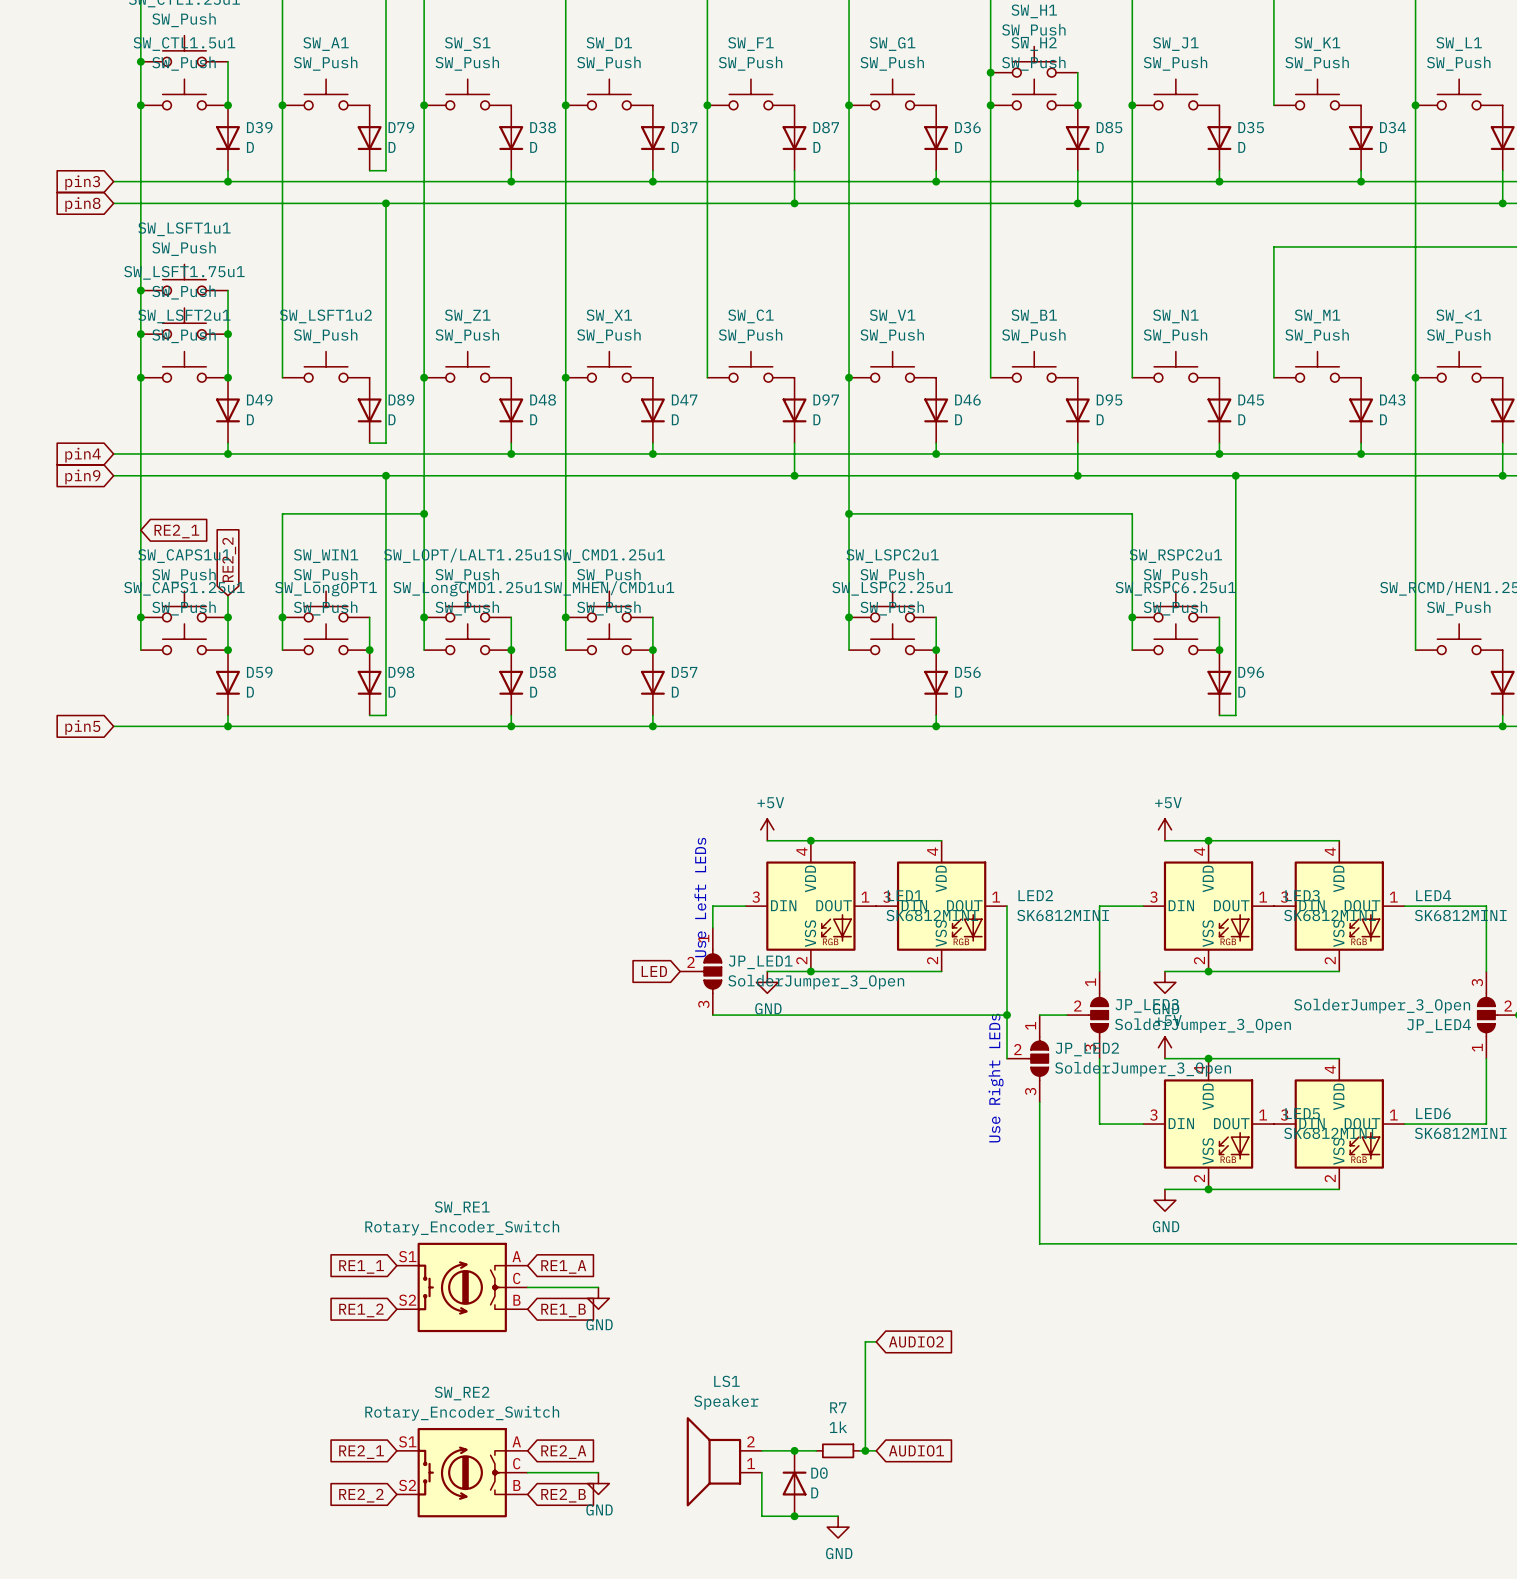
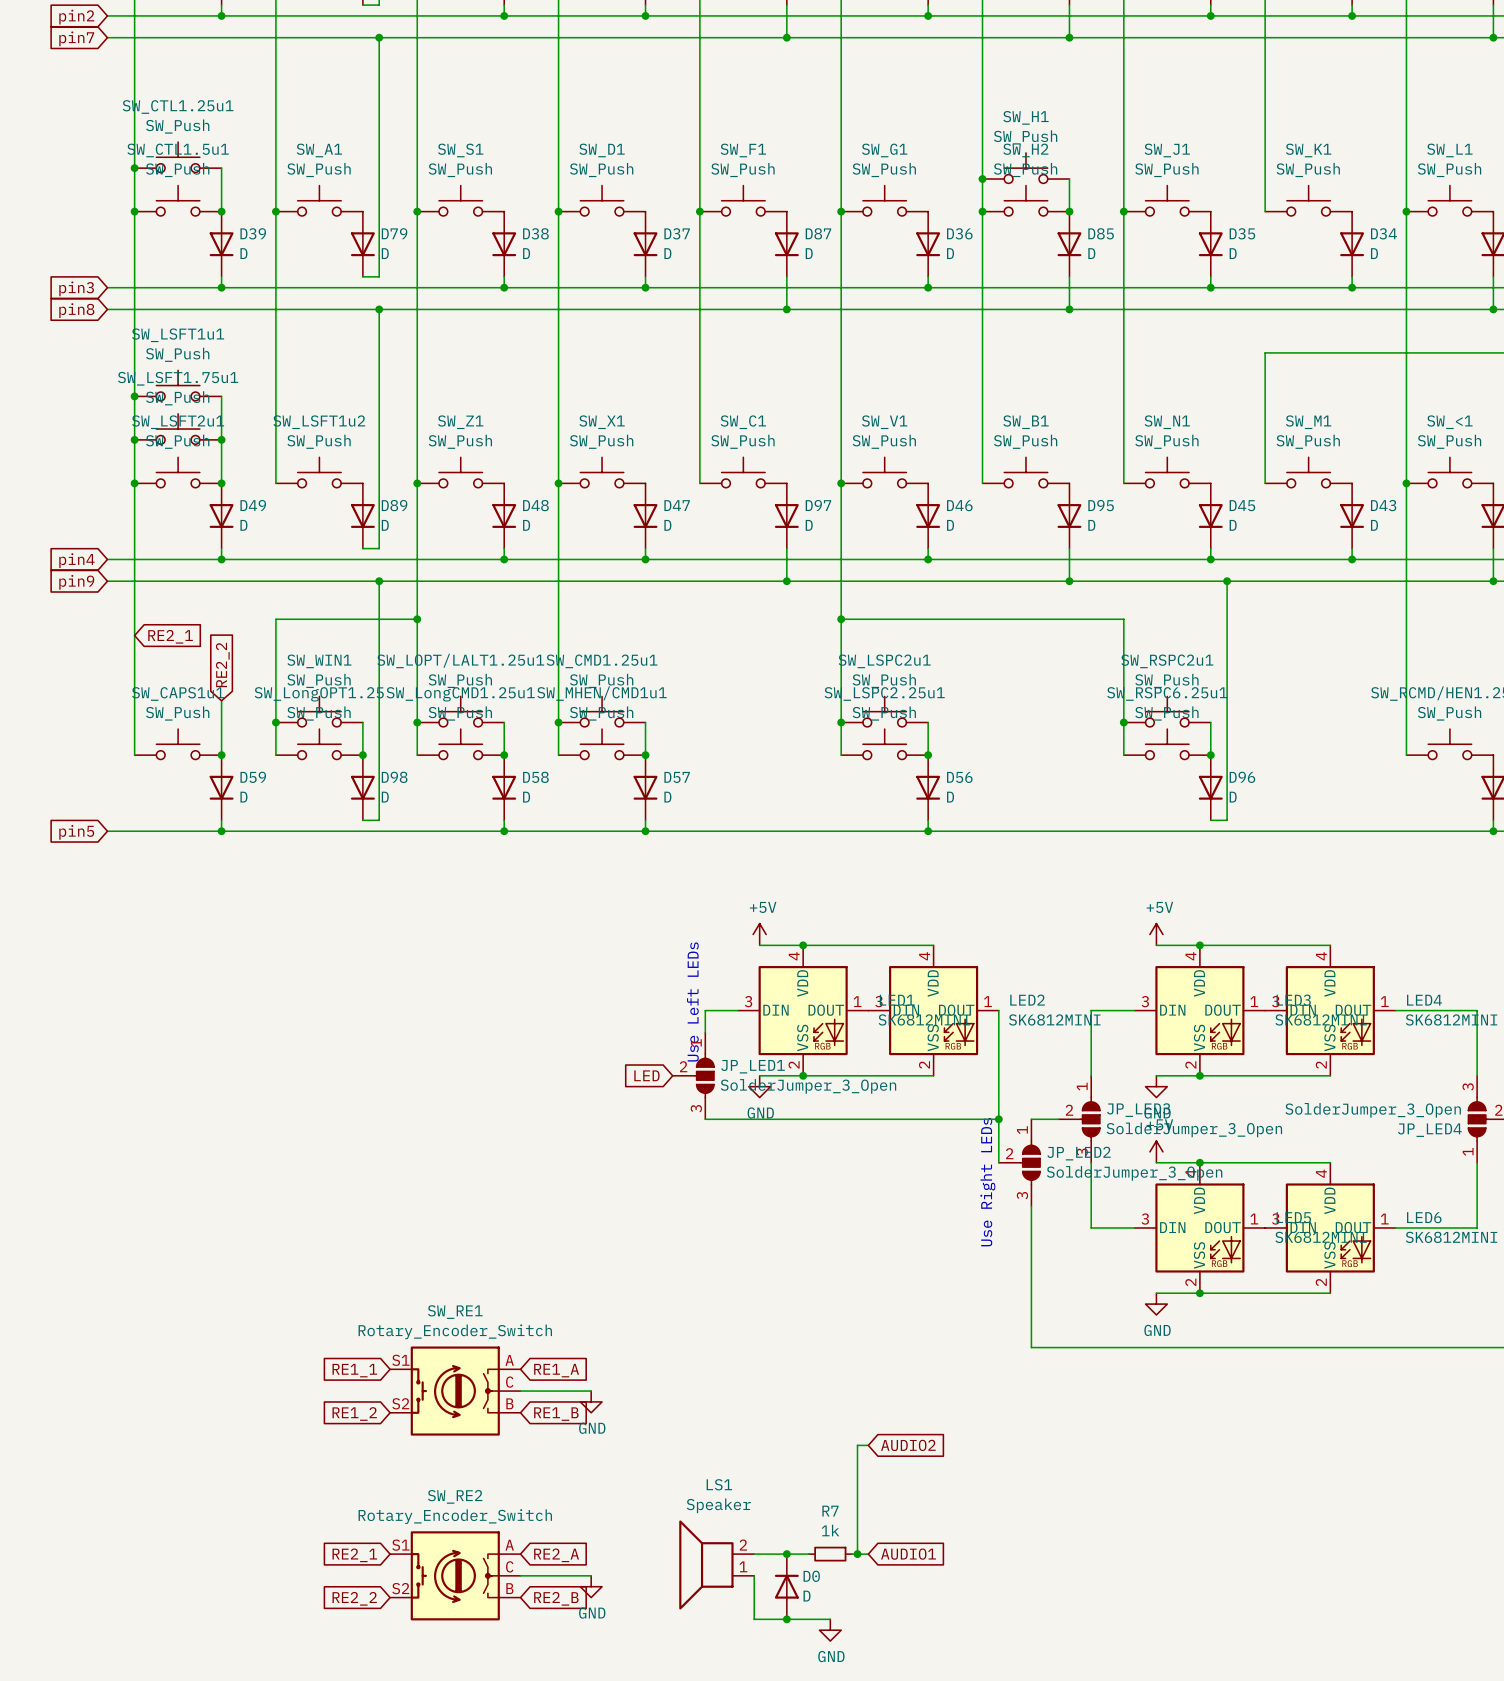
SW_CAPS1.25u1 name: SW_CAPS1.25u1 (184, 588) -> SW_CAPS1u1 (178, 693)
SW_LongOPT1 name: SW_LongOPT1 (326, 589) -> SW_LongOPT1.25 (319, 694)
SW_CAPS1u1: SW_Push (184, 606) -> none
junction: (140, 617) -> none
junction: (228, 617) -> none

